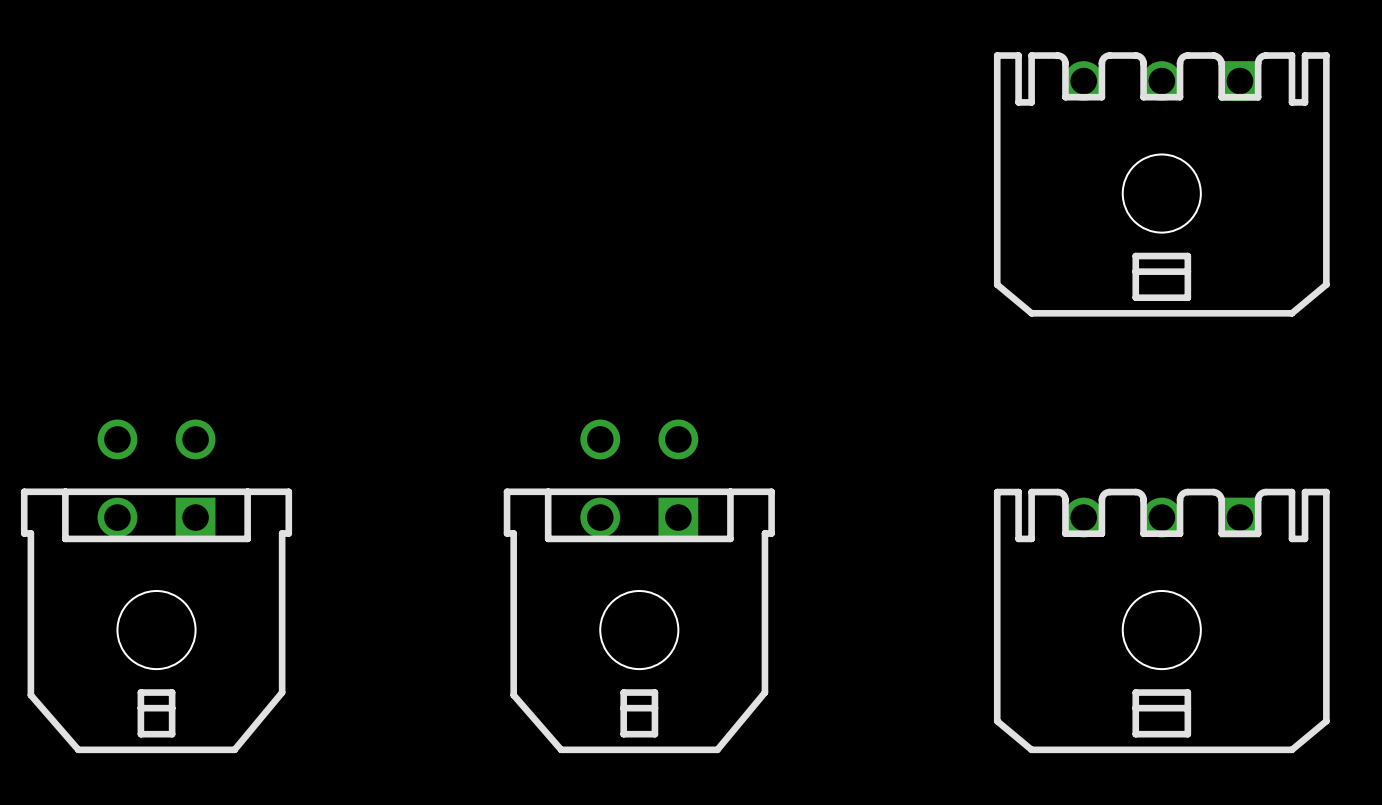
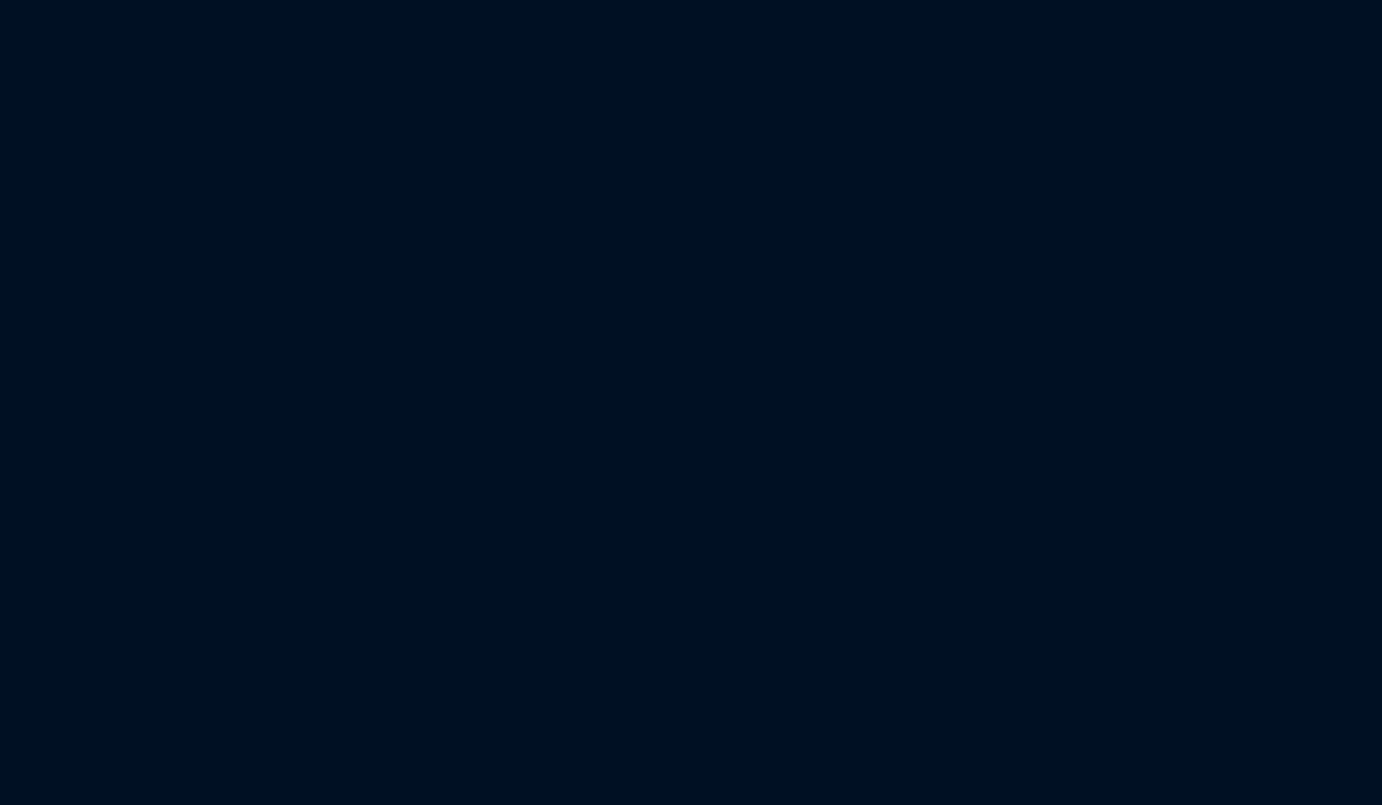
part: (1161, 184) -> none
part: (156, 586) -> none
part: (639, 586) -> none
part: (1161, 620) -> none

